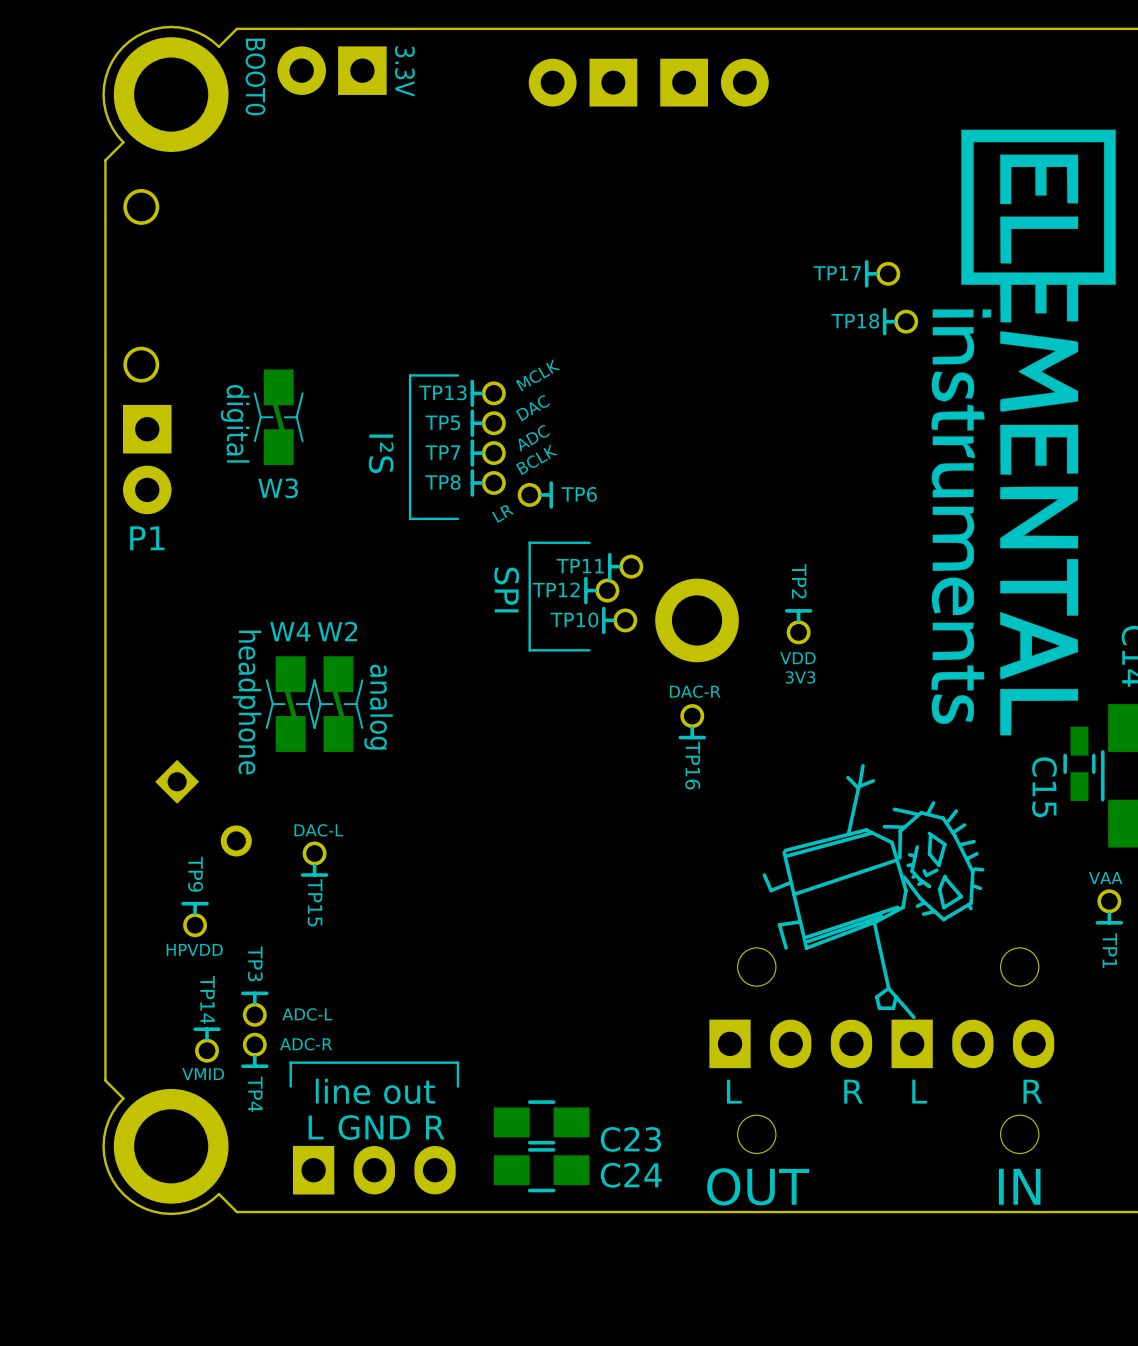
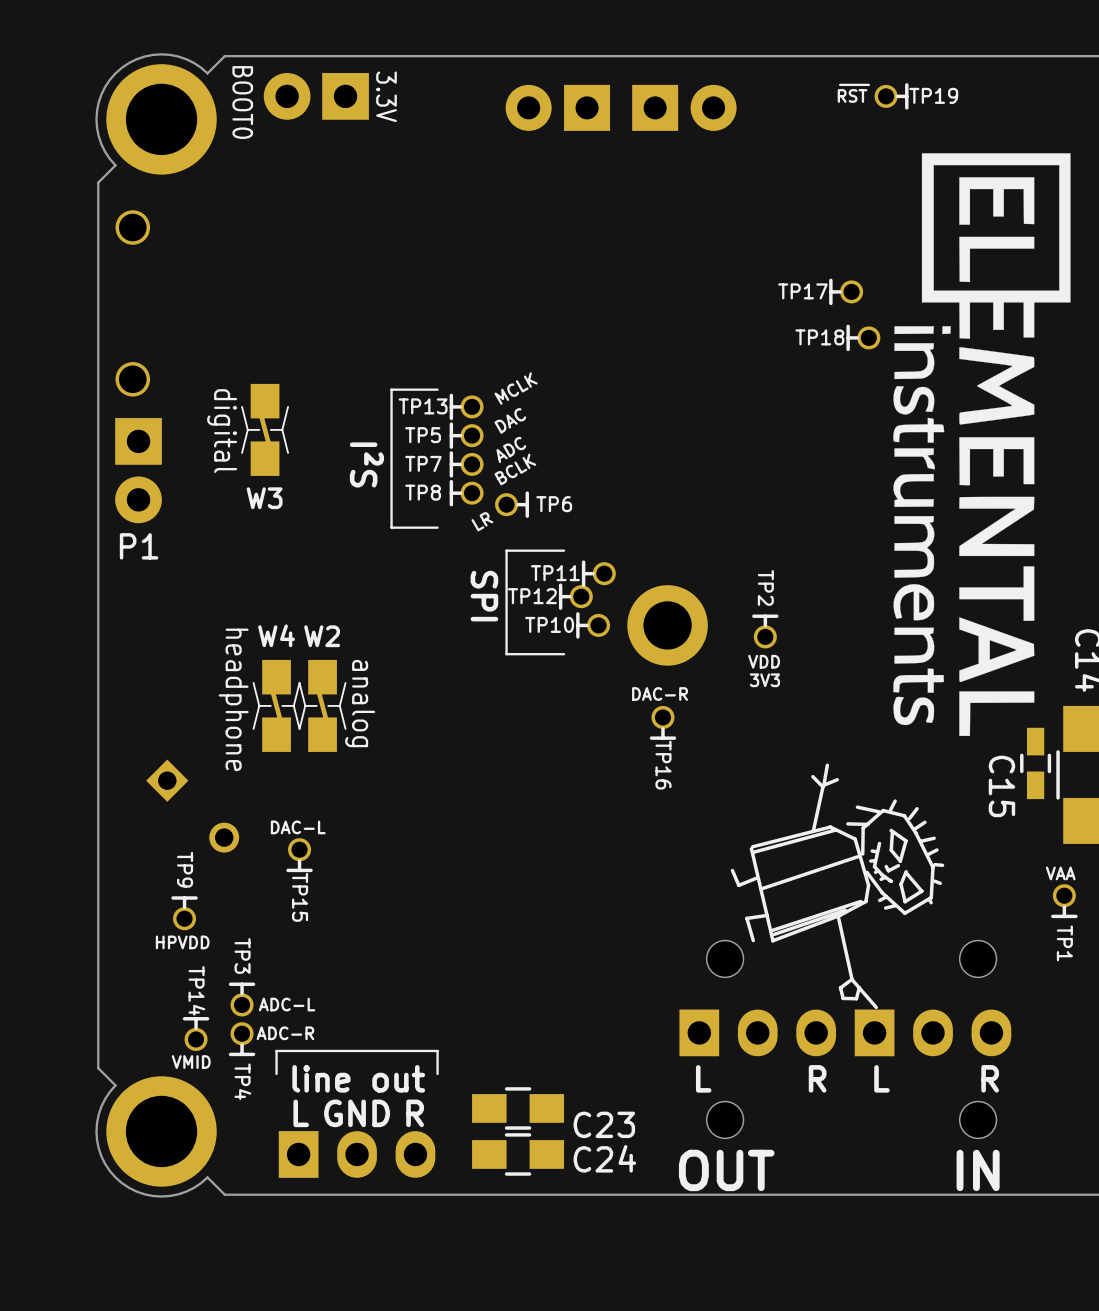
line: none -> (868, 84) (840, 84)
text: none -> RST (852, 95)
TP19: none -> (891, 96)

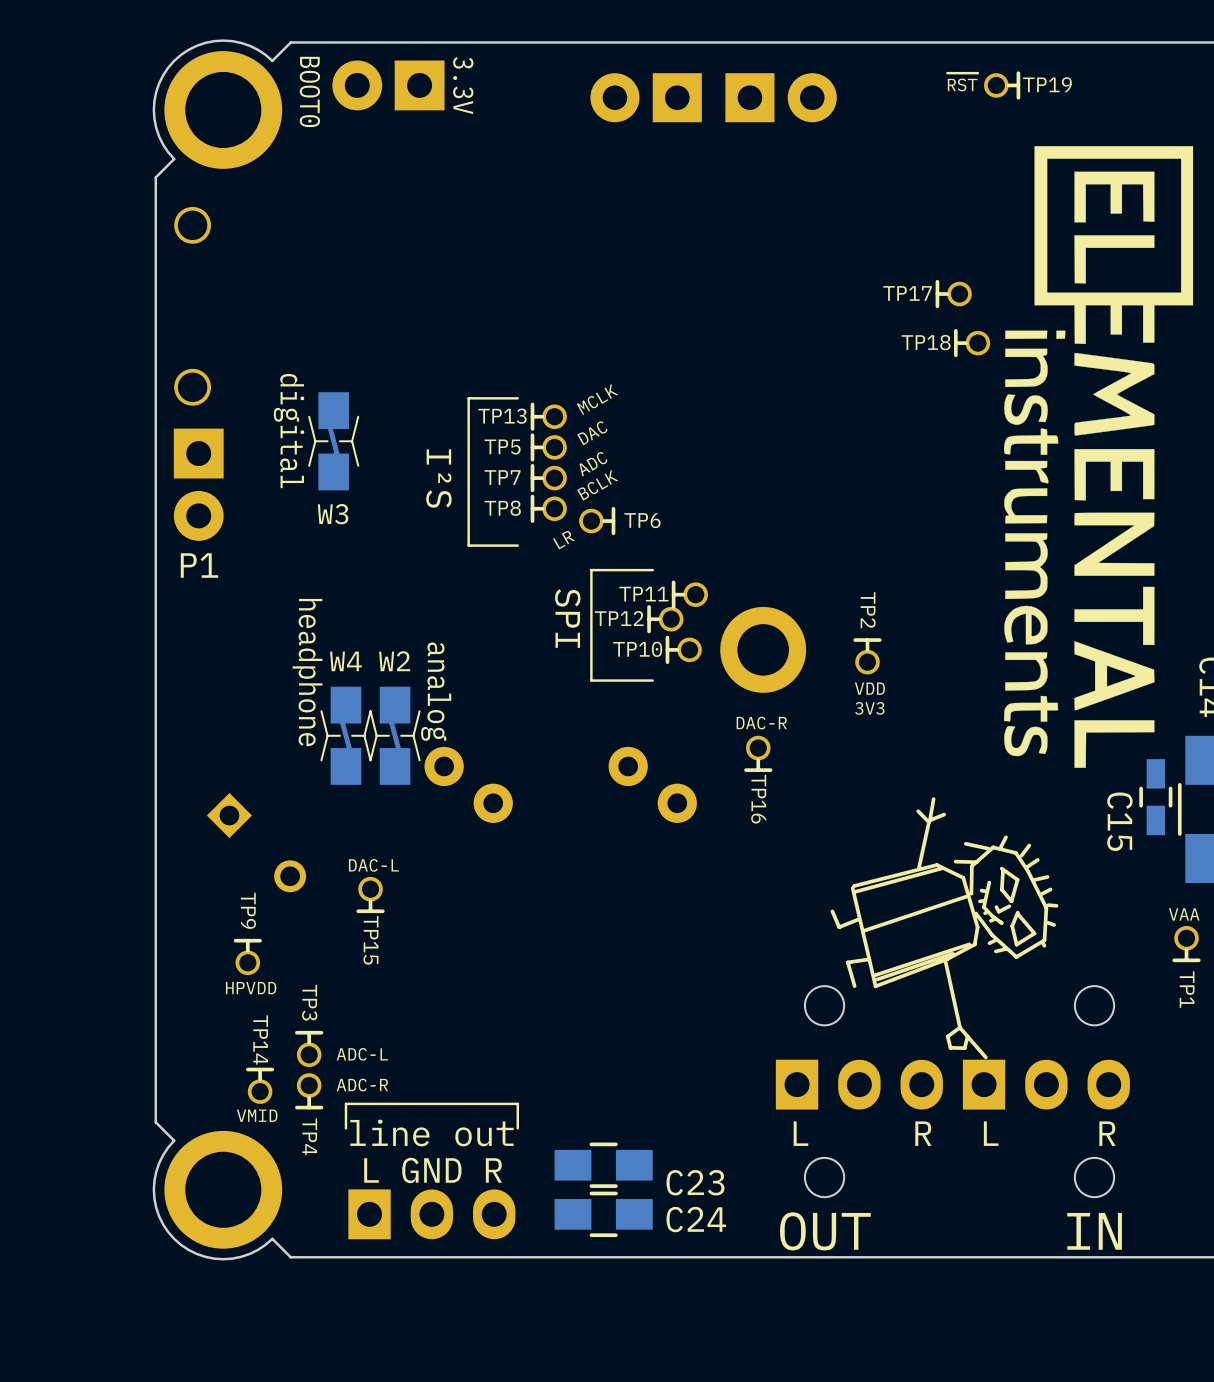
text position: headphone (233, 699) -> headphone (307, 672)
text position: analog (360, 703) -> analog (436, 691)
part: none -> (468, 784)
part: none -> (652, 784)

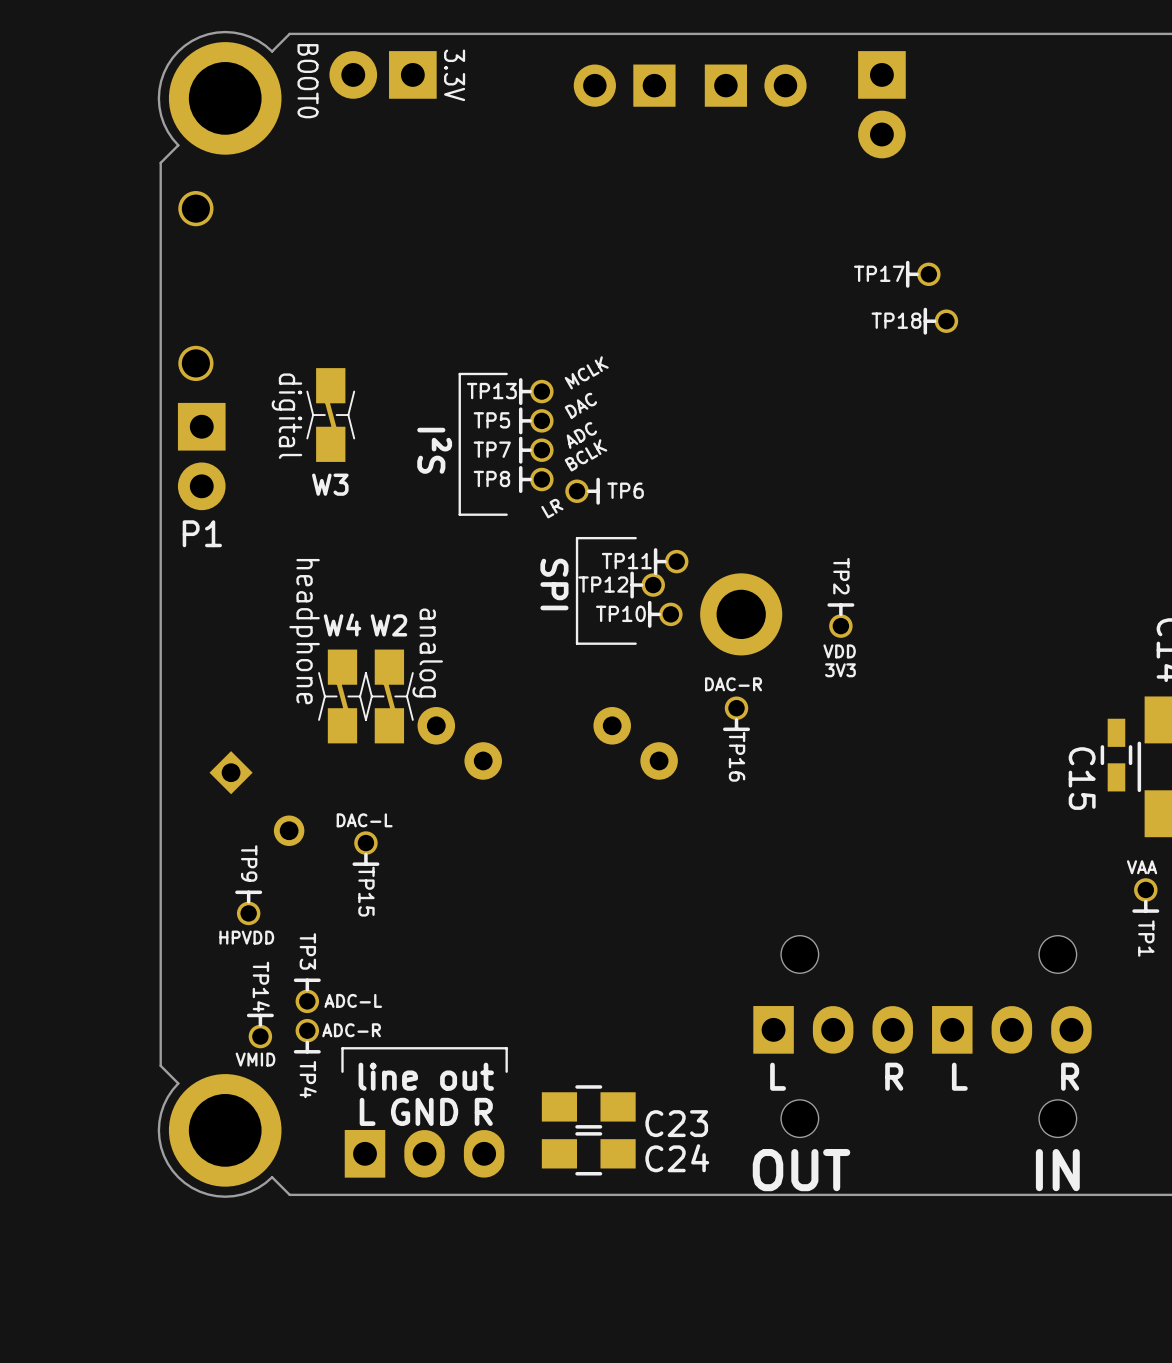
part footprint: [590, 73, 702, 123] -> [573, 64, 676, 107]
part footprint: [725, 73, 837, 123] -> [704, 64, 807, 107]
line: (977, 73) (947, 73) -> none
text: RST (962, 84) -> none
TP19: (1002, 85) -> none
part: none -> (881, 104)
drawing: [830, 146, 1194, 1060] -> none

